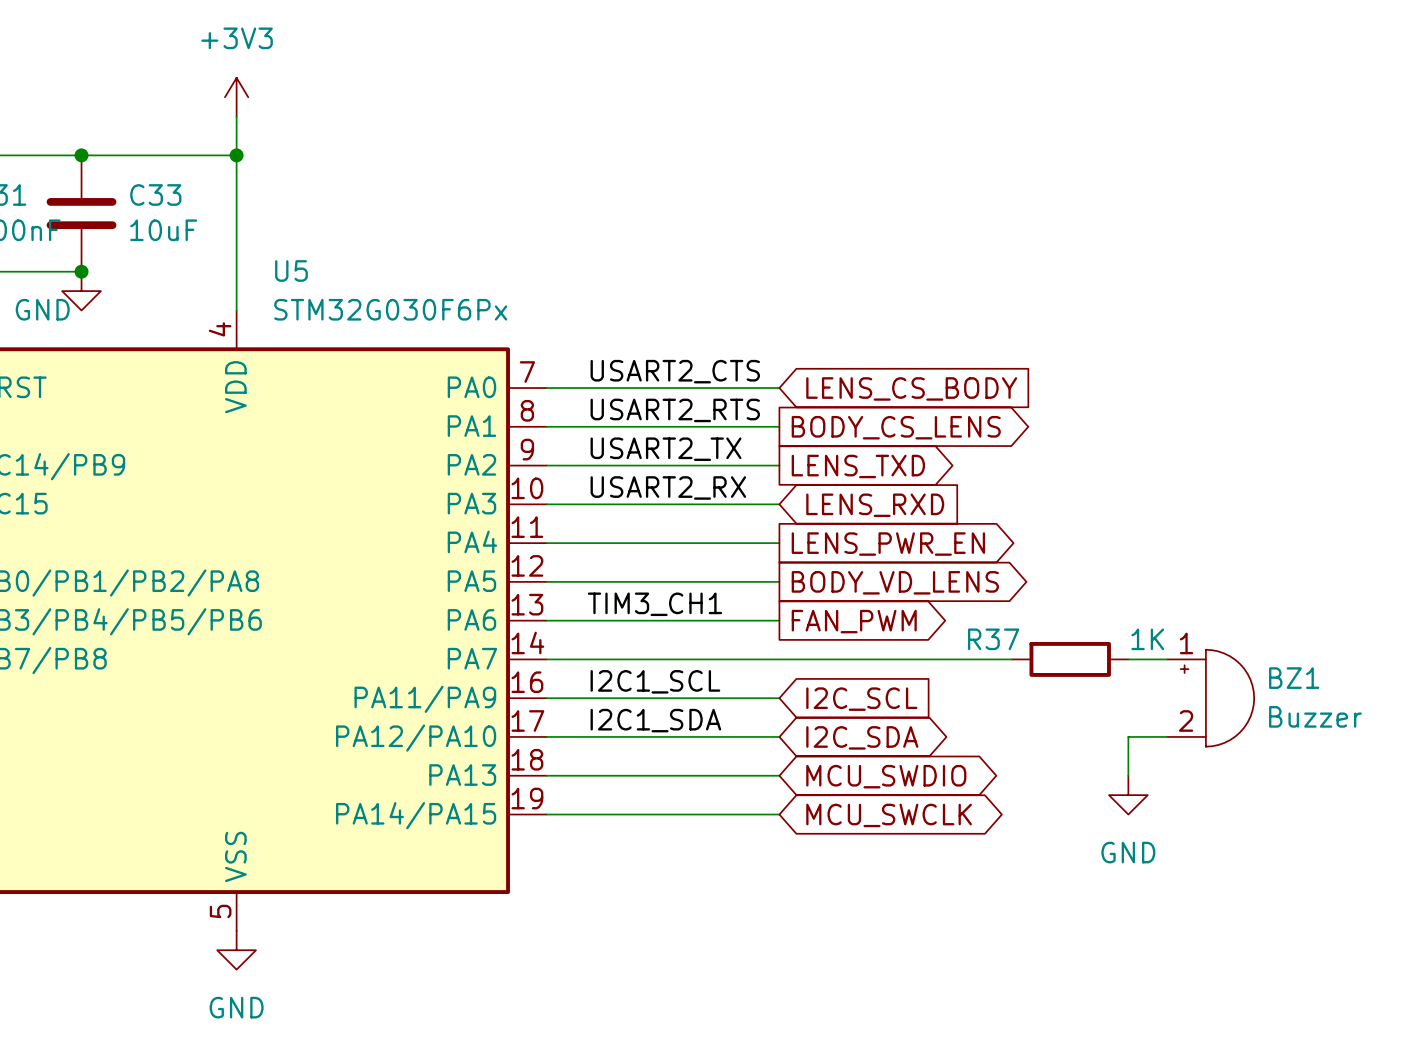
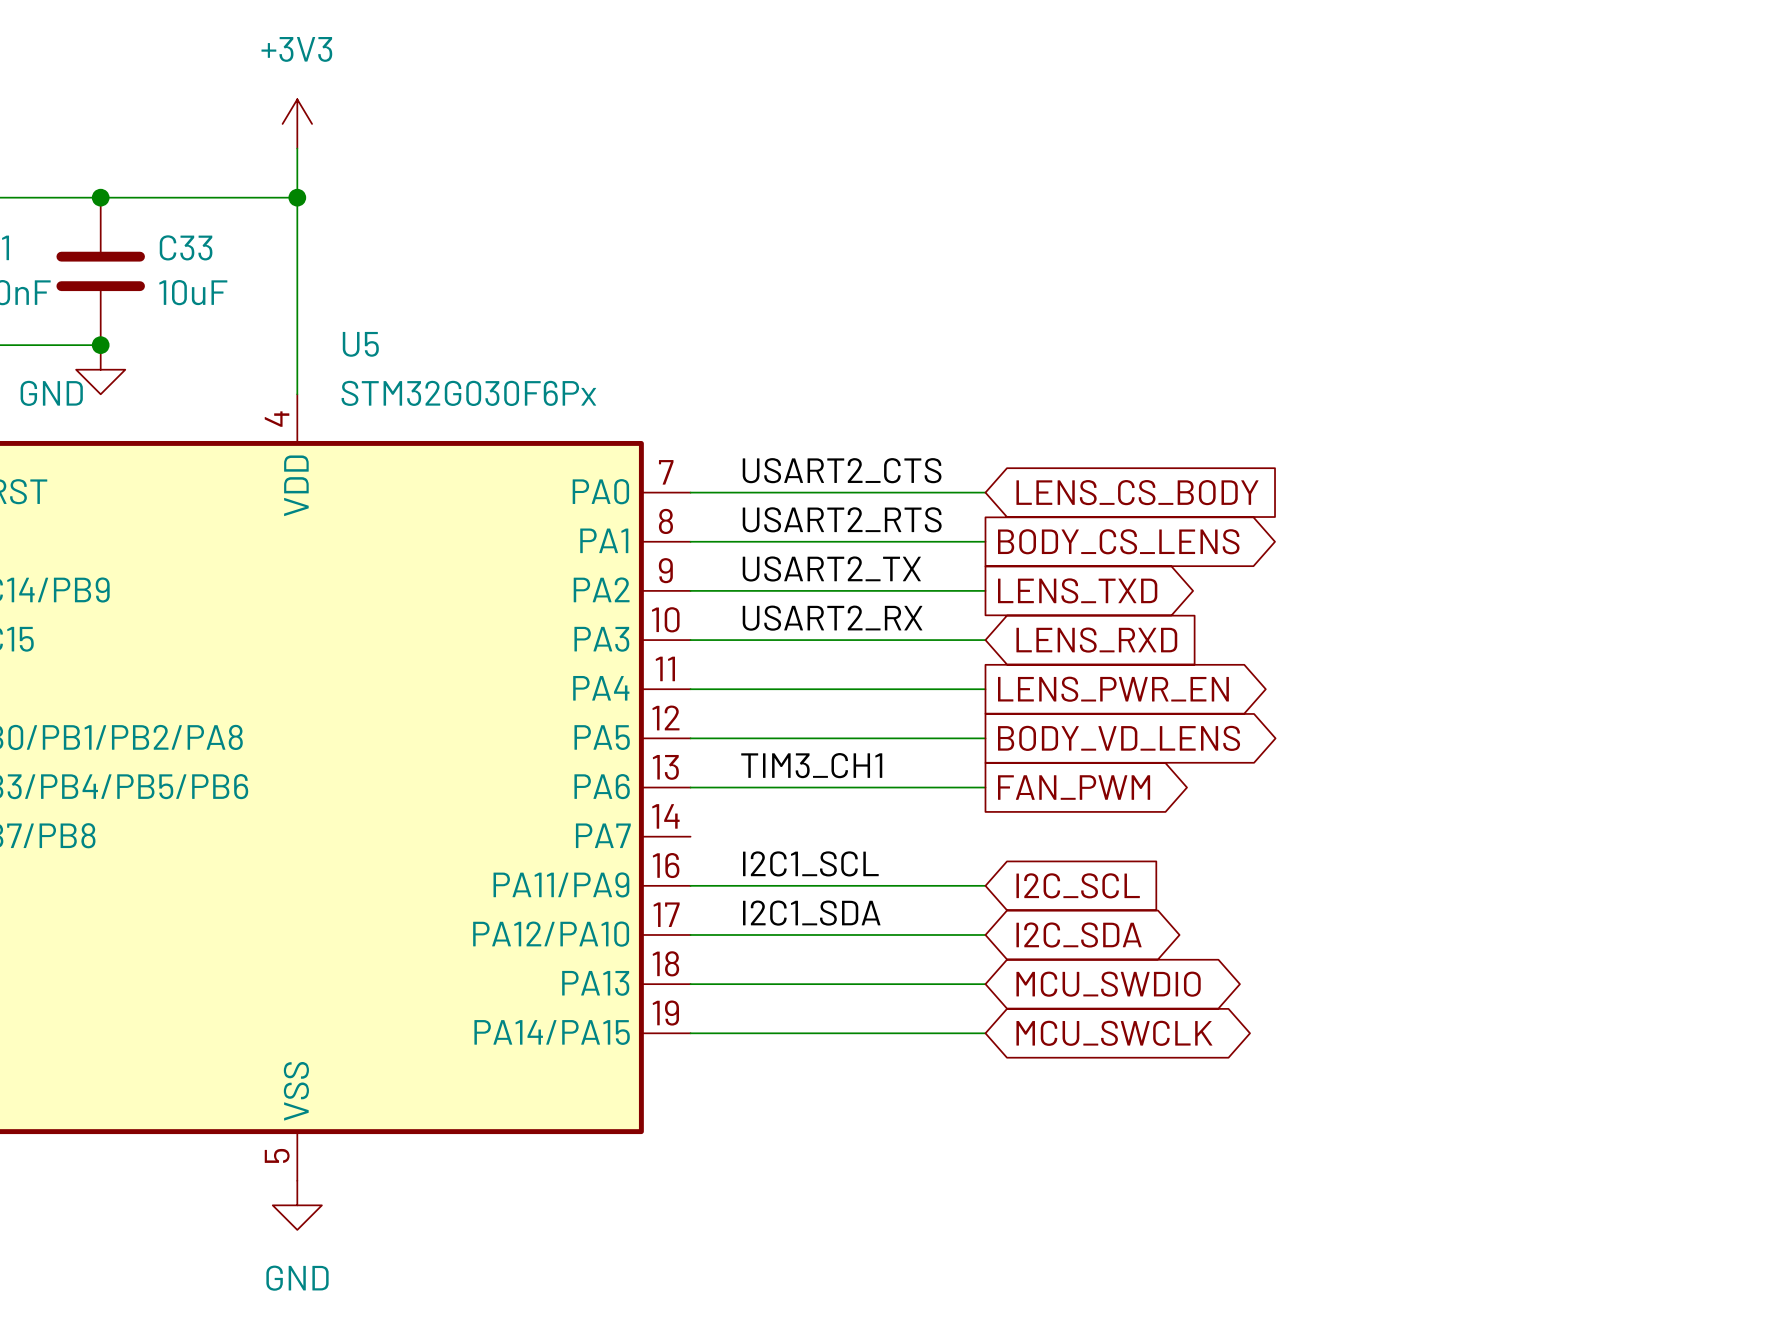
wire: (546, 659) (1012, 659) -> none
R37: 1K (1070, 659) -> none
wire: (1128, 659) (1167, 659) -> none
BZ1: Buzzer (1210, 698) -> none
wire: (1167, 736) (1128, 736) (1128, 775) -> none
power symbol: GND (1128, 795) -> none

